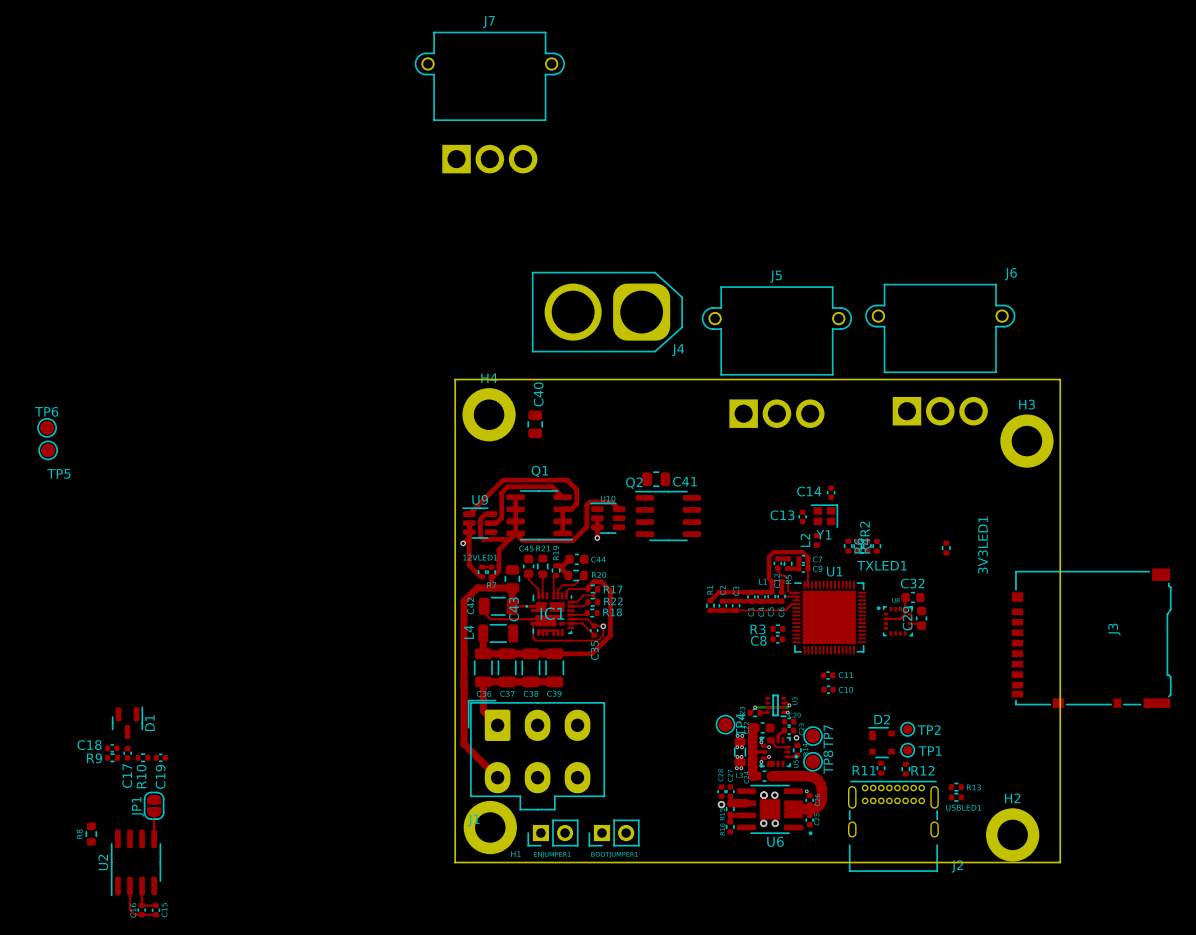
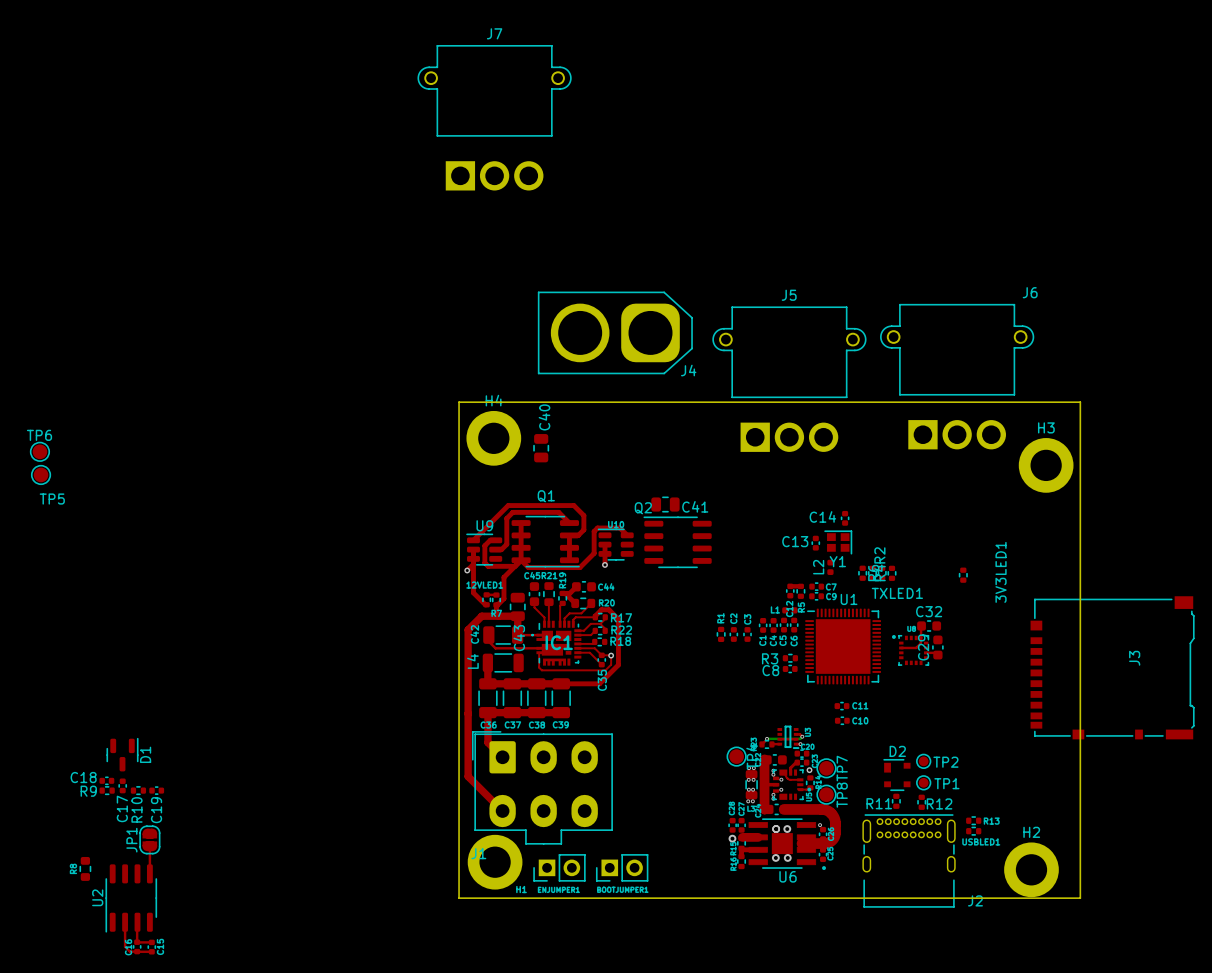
top track: (798, 559) (798, 568) (788, 568) -> none
top track: (777, 567) (777, 571) (787, 578) (787, 590) (790, 592) (796, 592) -> none
top track: (807, 568) (808, 584) (804, 584) -> none
top track: (808, 568) (808, 557) (802, 552) (773, 552) (768, 557) (768, 578) (772, 582) (771, 592) -> none
top track: (781, 582) (781, 592) (786, 596) (796, 596) (796, 600) -> none
top track: (771, 592) (718, 592) (710, 600) -> none
top track: (722, 601) (781, 601) -> none
top track: (796, 604) (791, 604) (785, 610) -> none
top track: (785, 610) (710, 610) -> none

